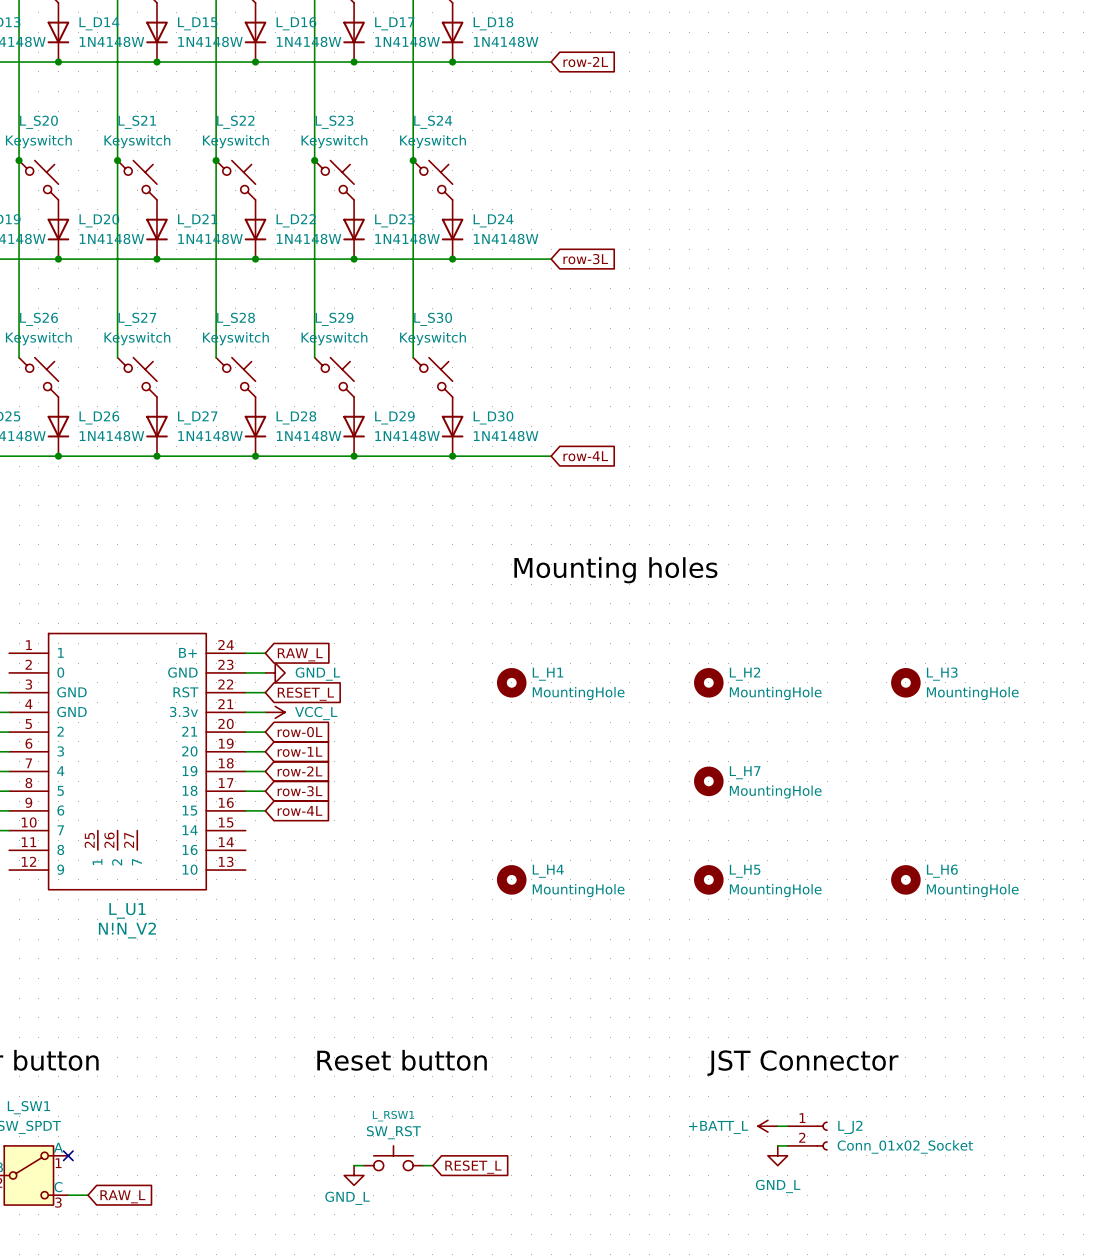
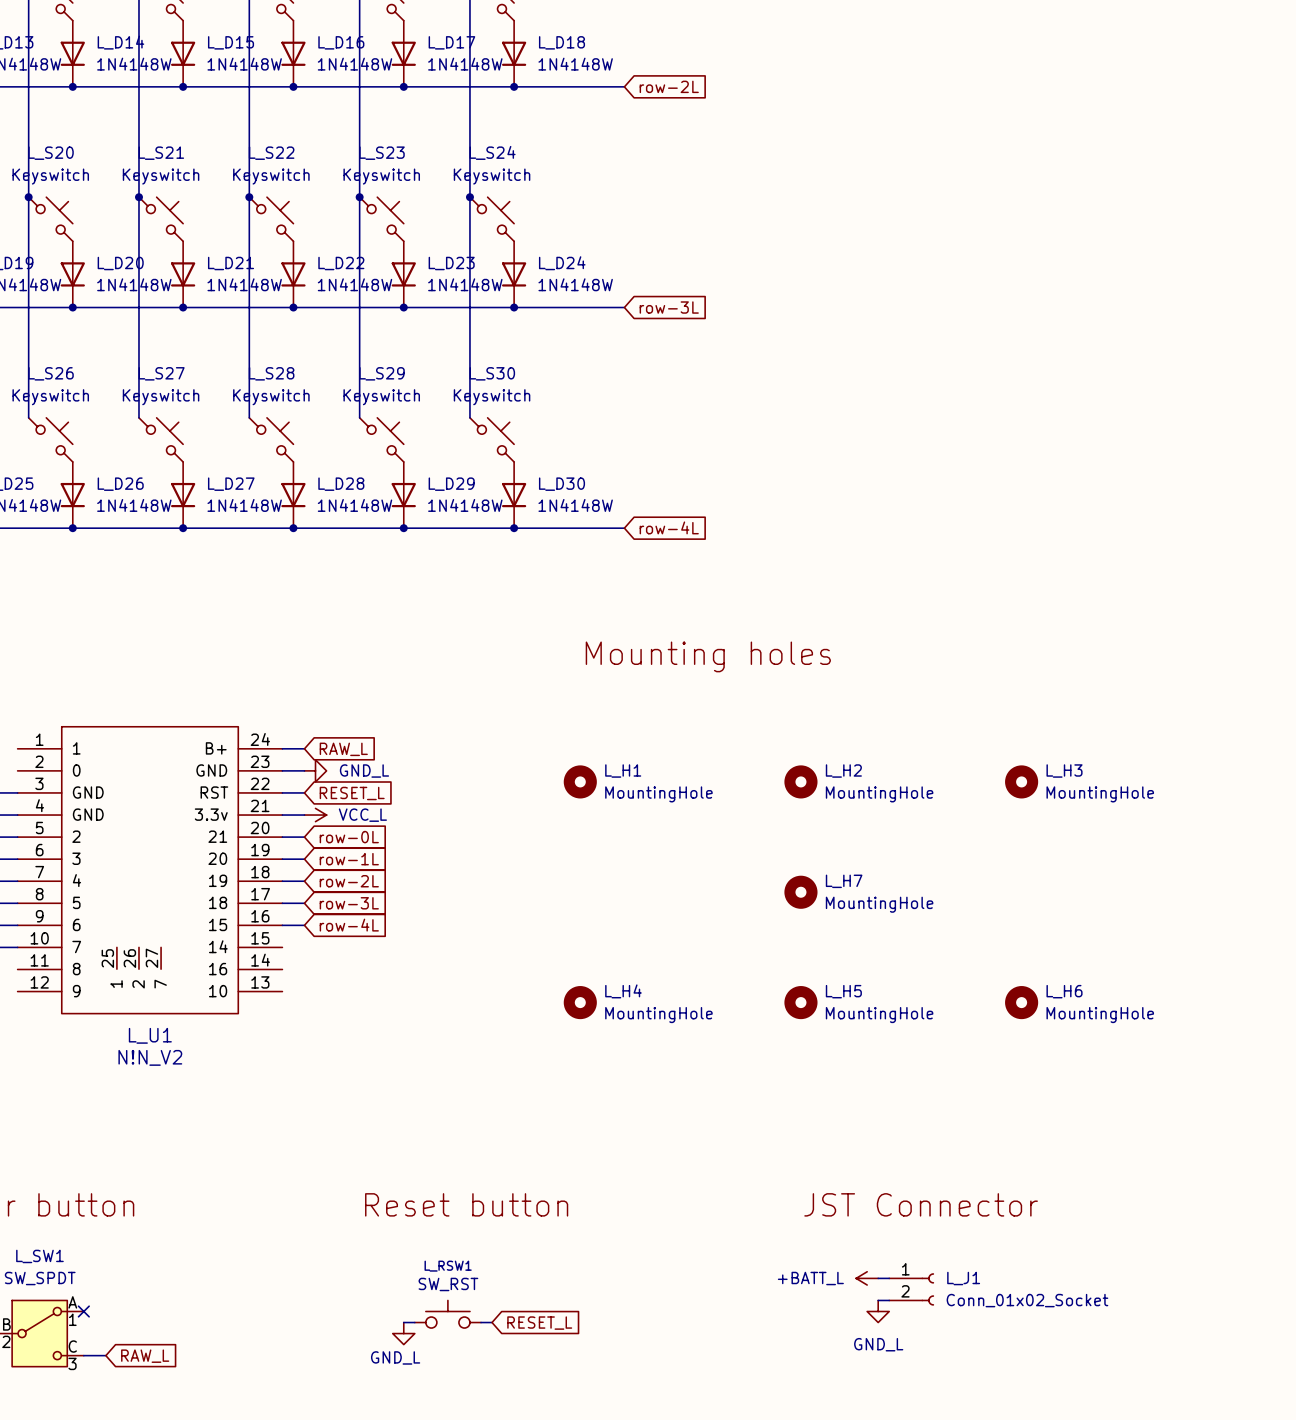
L_J2 name: L_J2 (850, 1127) -> L_J1 (963, 1278)

